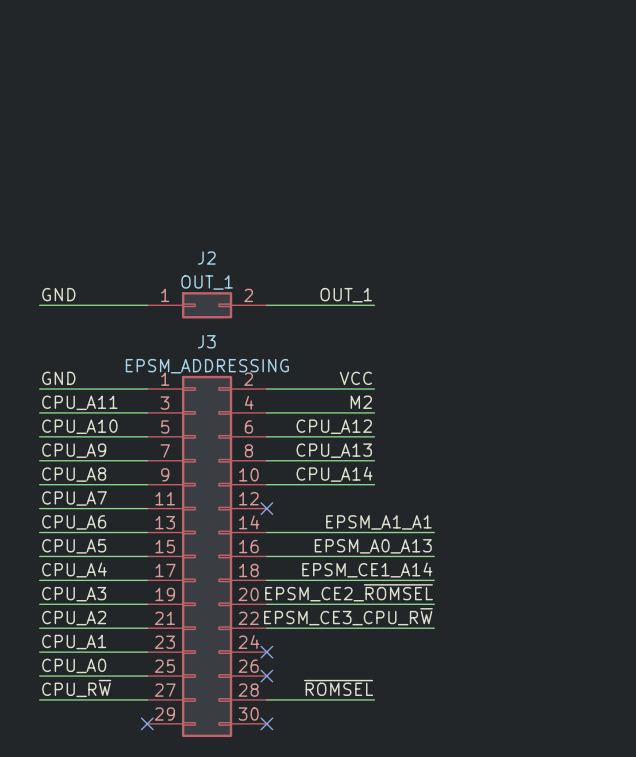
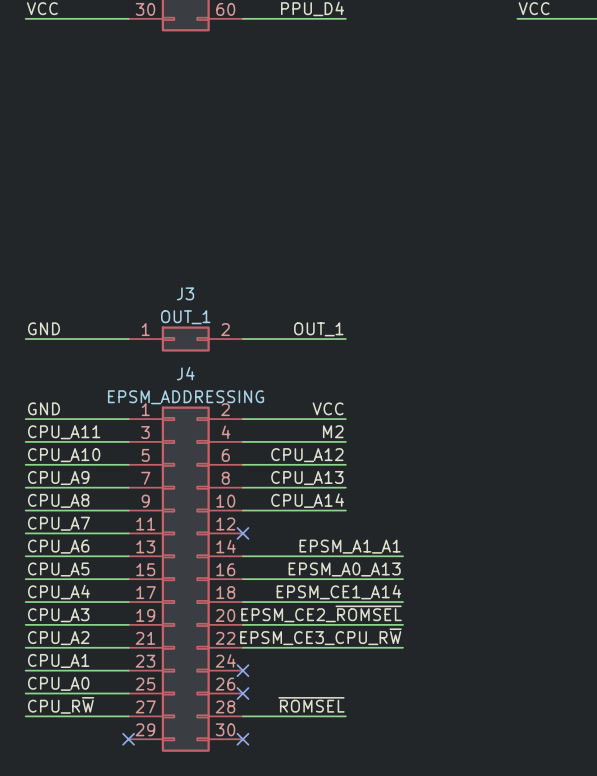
J2 name: J2 (206, 258) -> J3 (185, 293)
J3 name: J3 (206, 341) -> J4 (185, 373)

